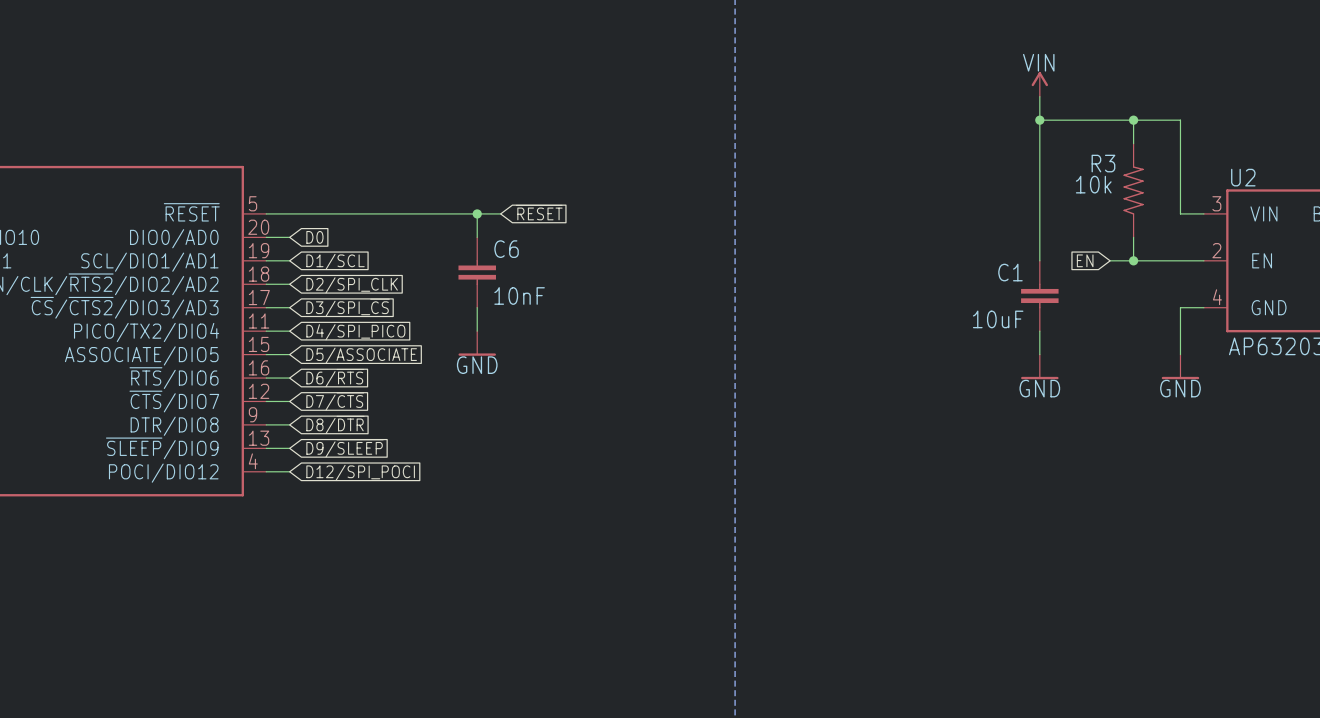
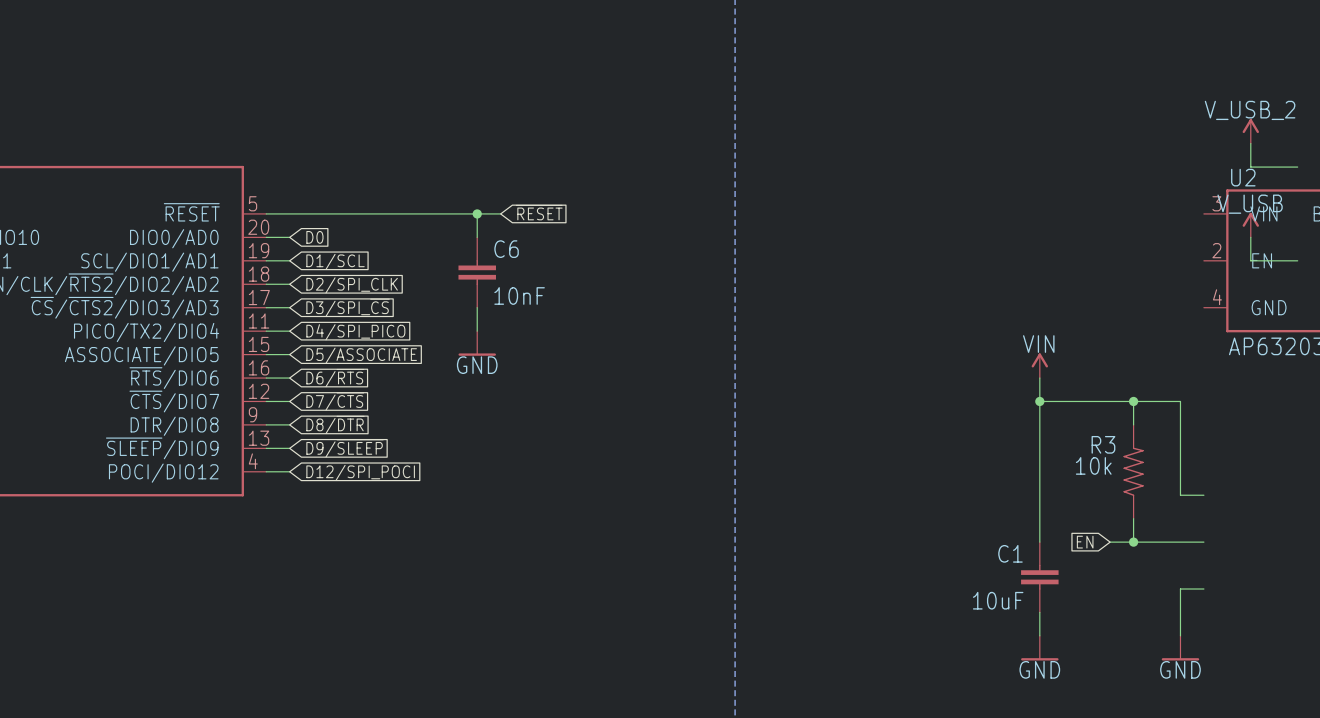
power symbol: VIN (1039, 84) -> none
wire: (1039, 96) (1039, 260) -> none
wire: (1039, 120) (1180, 120) (1180, 213) (1203, 213) -> none
junction: (1039, 120) -> none
wire: (1133, 120) (1133, 143) -> none
junction: (1133, 120) -> none
power symbol: none -> V_USB_2 (1250, 131)
wire: none -> (1250, 143) (1250, 167) (1297, 167)
R3 position: (1133, 190) -> (1133, 471)
power symbol: none -> V_USB (1250, 225)
wire: (1133, 237) (1133, 260) -> none
wire: none -> (1250, 237) (1250, 260) (1297, 260)
global label: EN (1085, 260) -> none
wire: (1110, 260) (1203, 260) -> none
junction: (1133, 260) -> none
C1 position: (1039, 295) -> (1039, 577)
wire: (1203, 307) (1180, 307) (1180, 354) -> none
wire: (1039, 331) (1039, 354) -> (1133, 401) (1133, 424)
power symbol: GND (1039, 366) -> VIN (1039, 365)
power symbol: GND (1180, 366) -> none
wire: none -> (1039, 378) (1039, 542)
wire: none -> (1039, 401) (1180, 401) (1180, 495) (1203, 495)
junction: none -> (1039, 401)
junction: none -> (1133, 401)
wire: none -> (1133, 518) (1133, 542)
global label: none -> EN (1085, 542)
wire: none -> (1110, 542) (1203, 542)
junction: none -> (1133, 542)
wire: none -> (1203, 589) (1180, 589) (1180, 635)
wire: none -> (1039, 612) (1039, 635)
power symbol: none -> GND (1039, 648)
power symbol: none -> GND (1180, 648)

